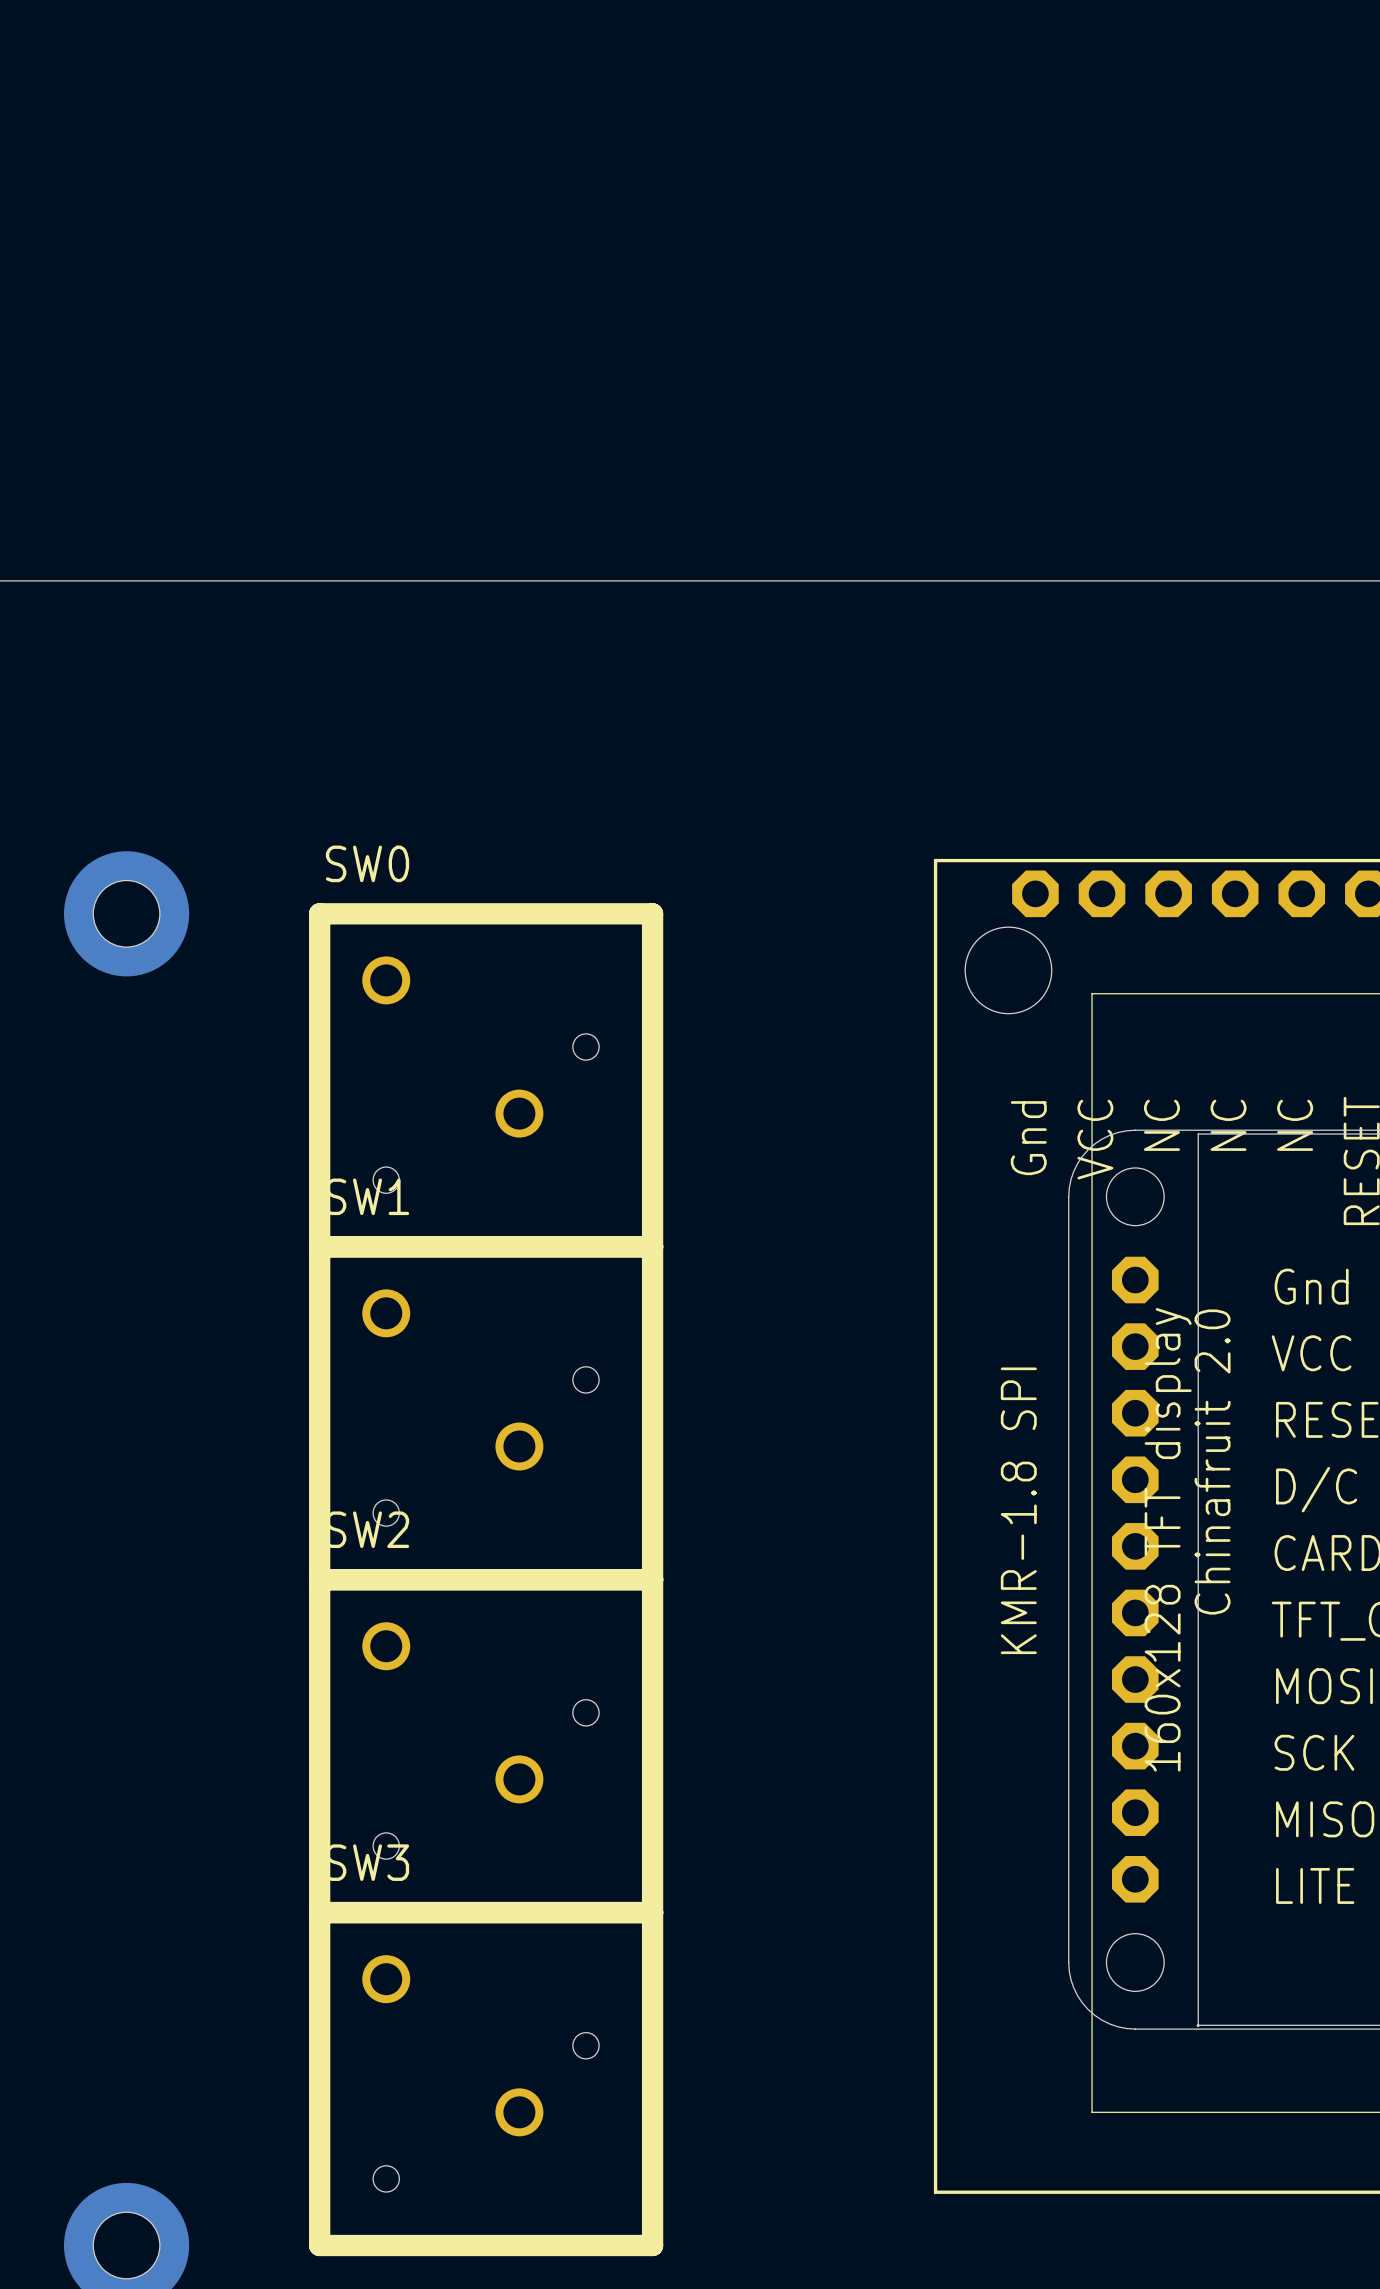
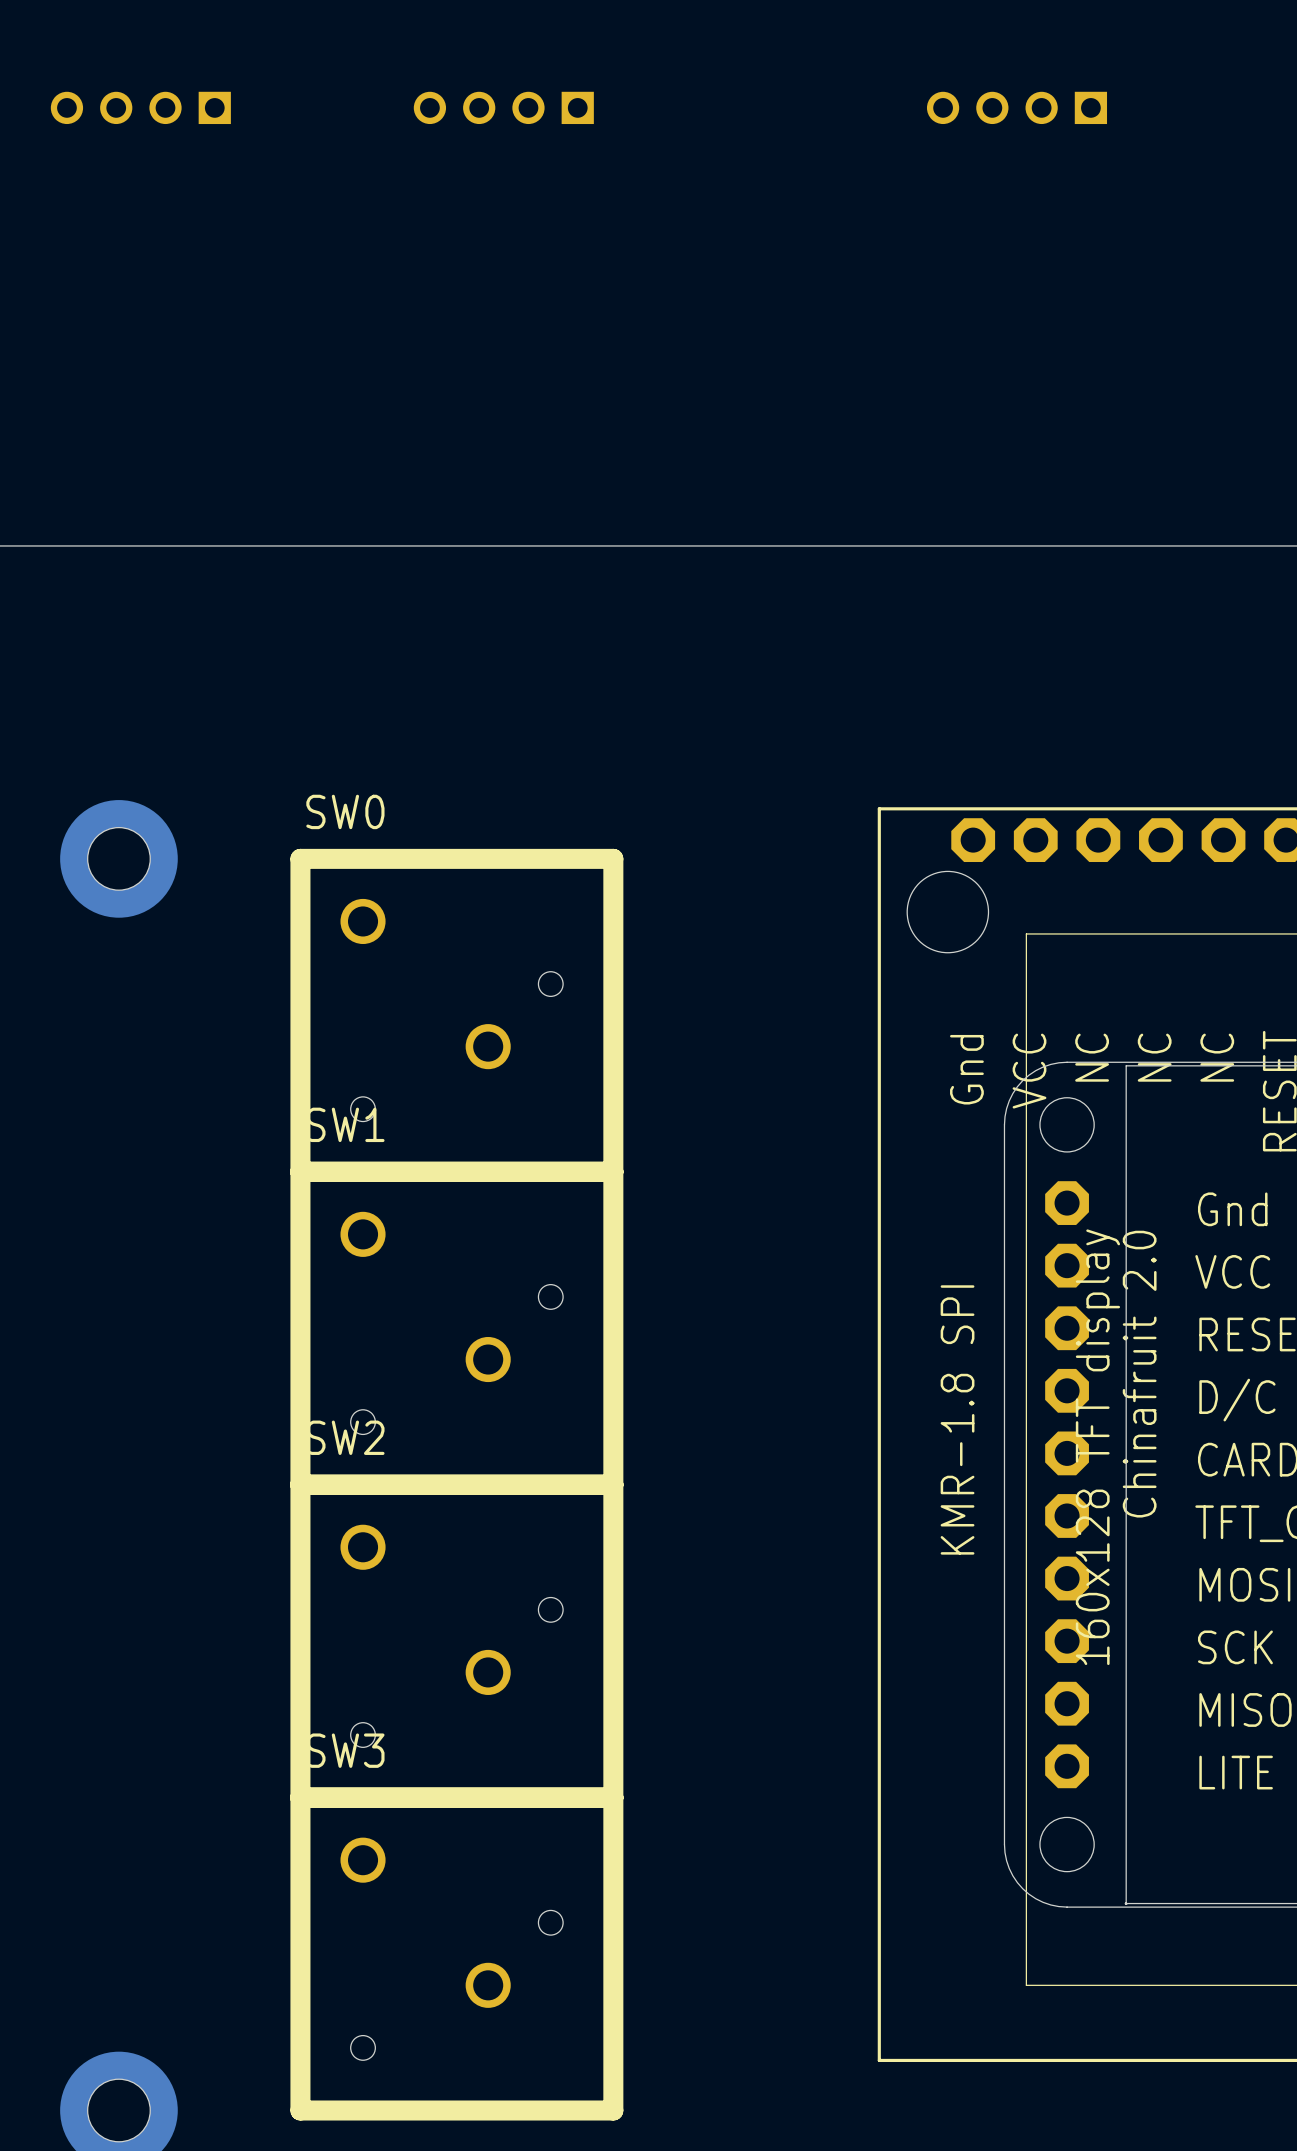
part: none -> (140, 107)
part: none -> (503, 107)
part: none -> (1016, 107)

